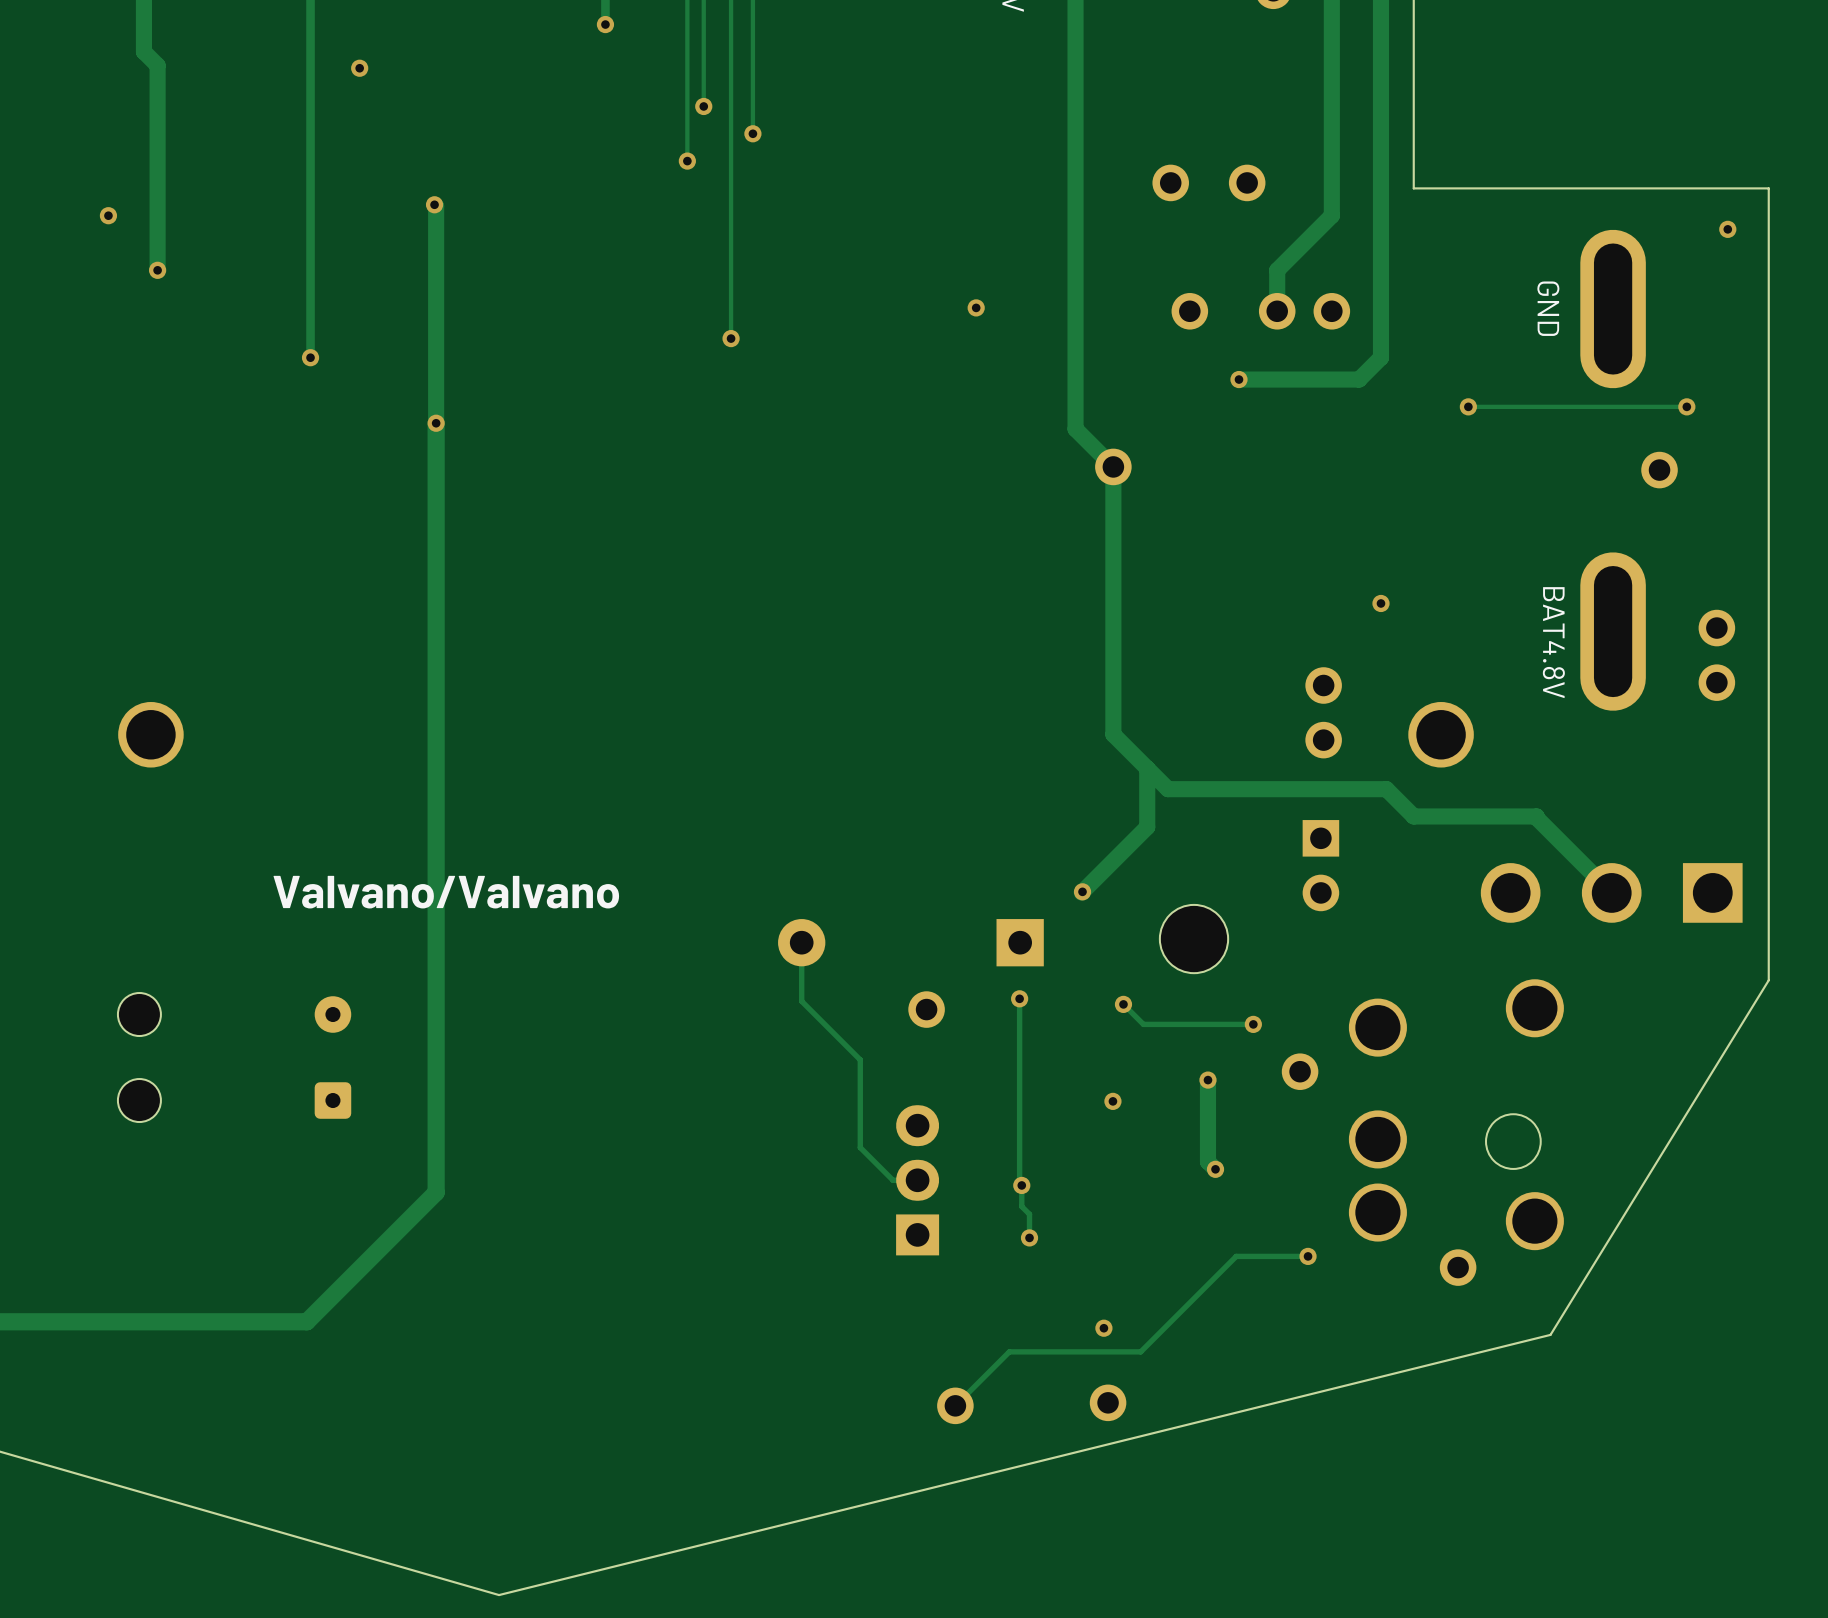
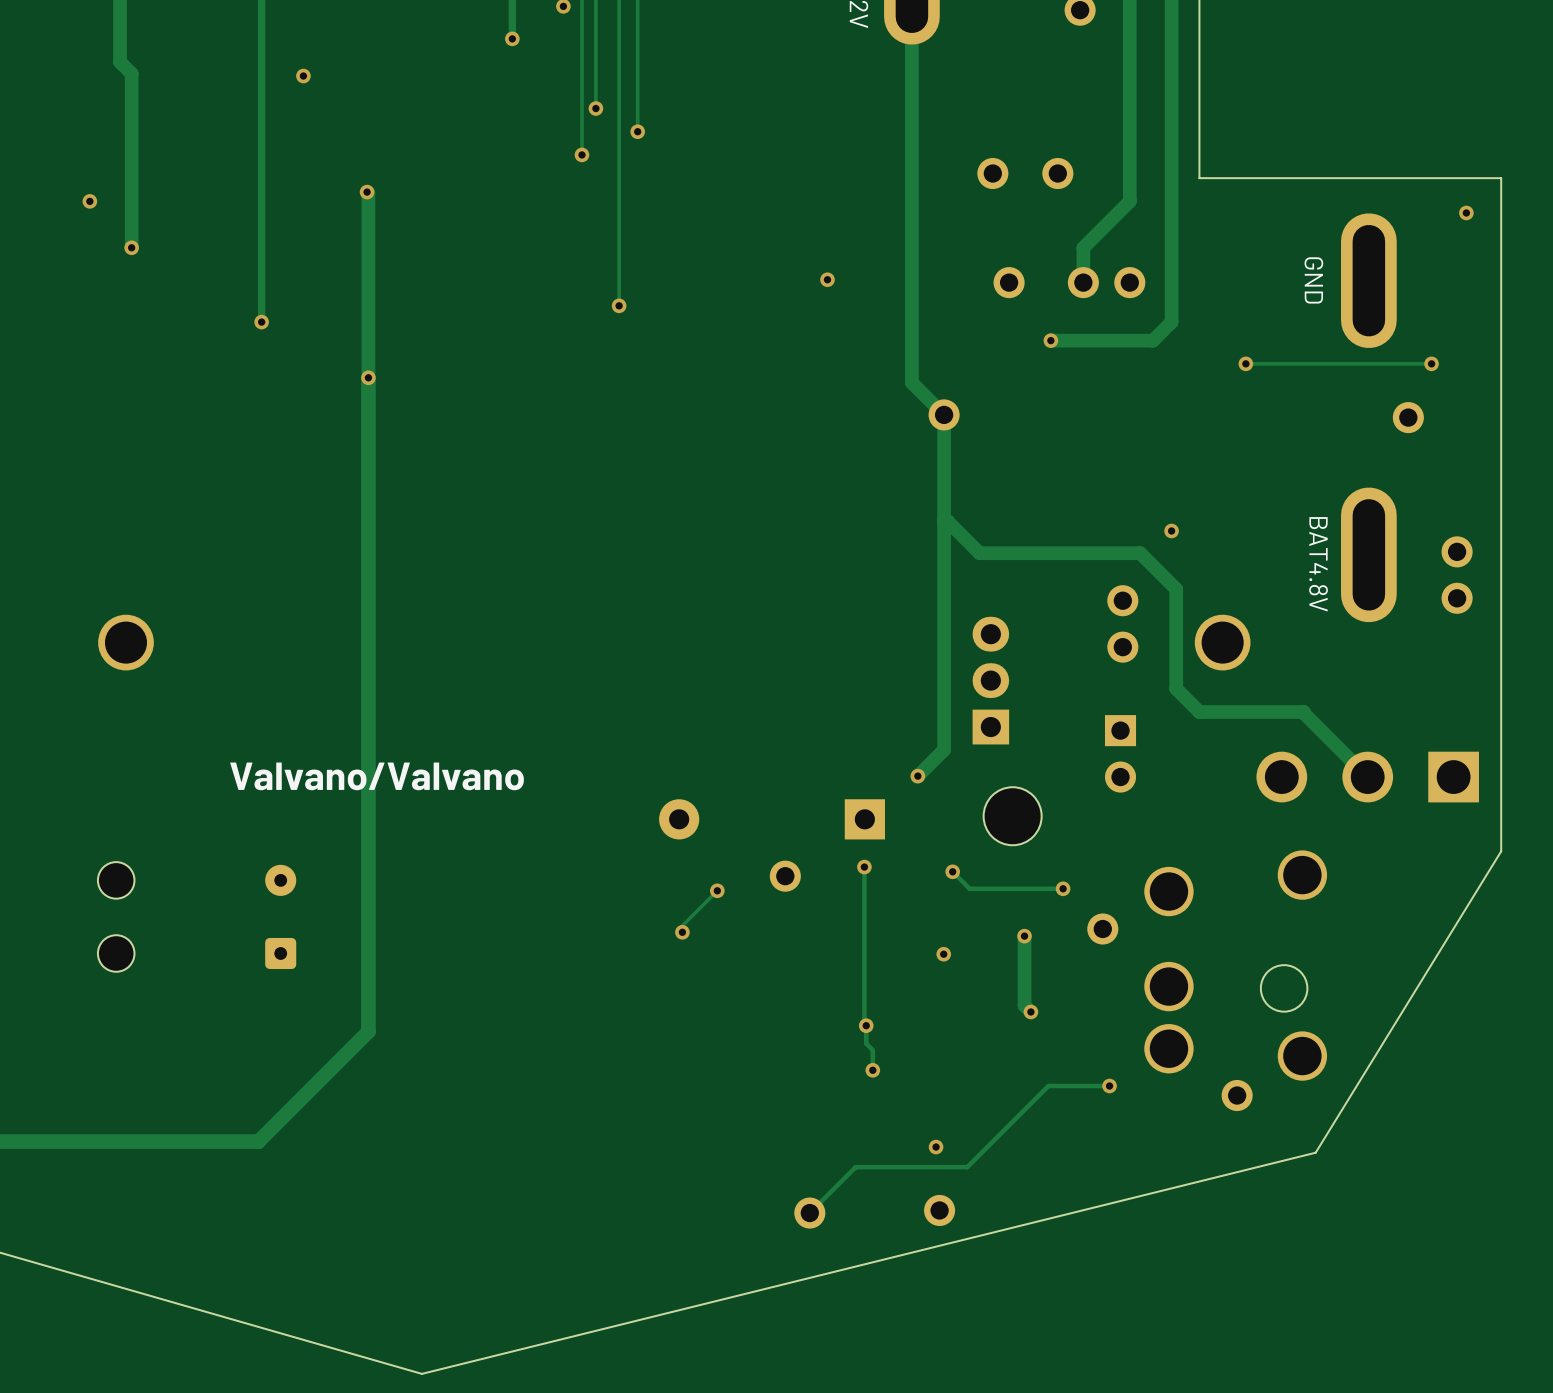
track: (1113, 734) (1167, 789) (1386, 789) -> (944, 521) (947, 521) (979, 553) (1140, 553) (1176, 589) (1176, 688)
track: (1147, 768) (1147, 827) (1113, 860) -> (944, 642) (944, 749)
track: (801, 942) (801, 1001) (860, 1059) (860, 1147) (892, 1180) (917, 1180) -> none
track: none -> (717, 890) (682, 925) (682, 932)
via: none -> (717, 890)
via: none -> (682, 932)
part position: (917, 1180) -> (990, 680)

